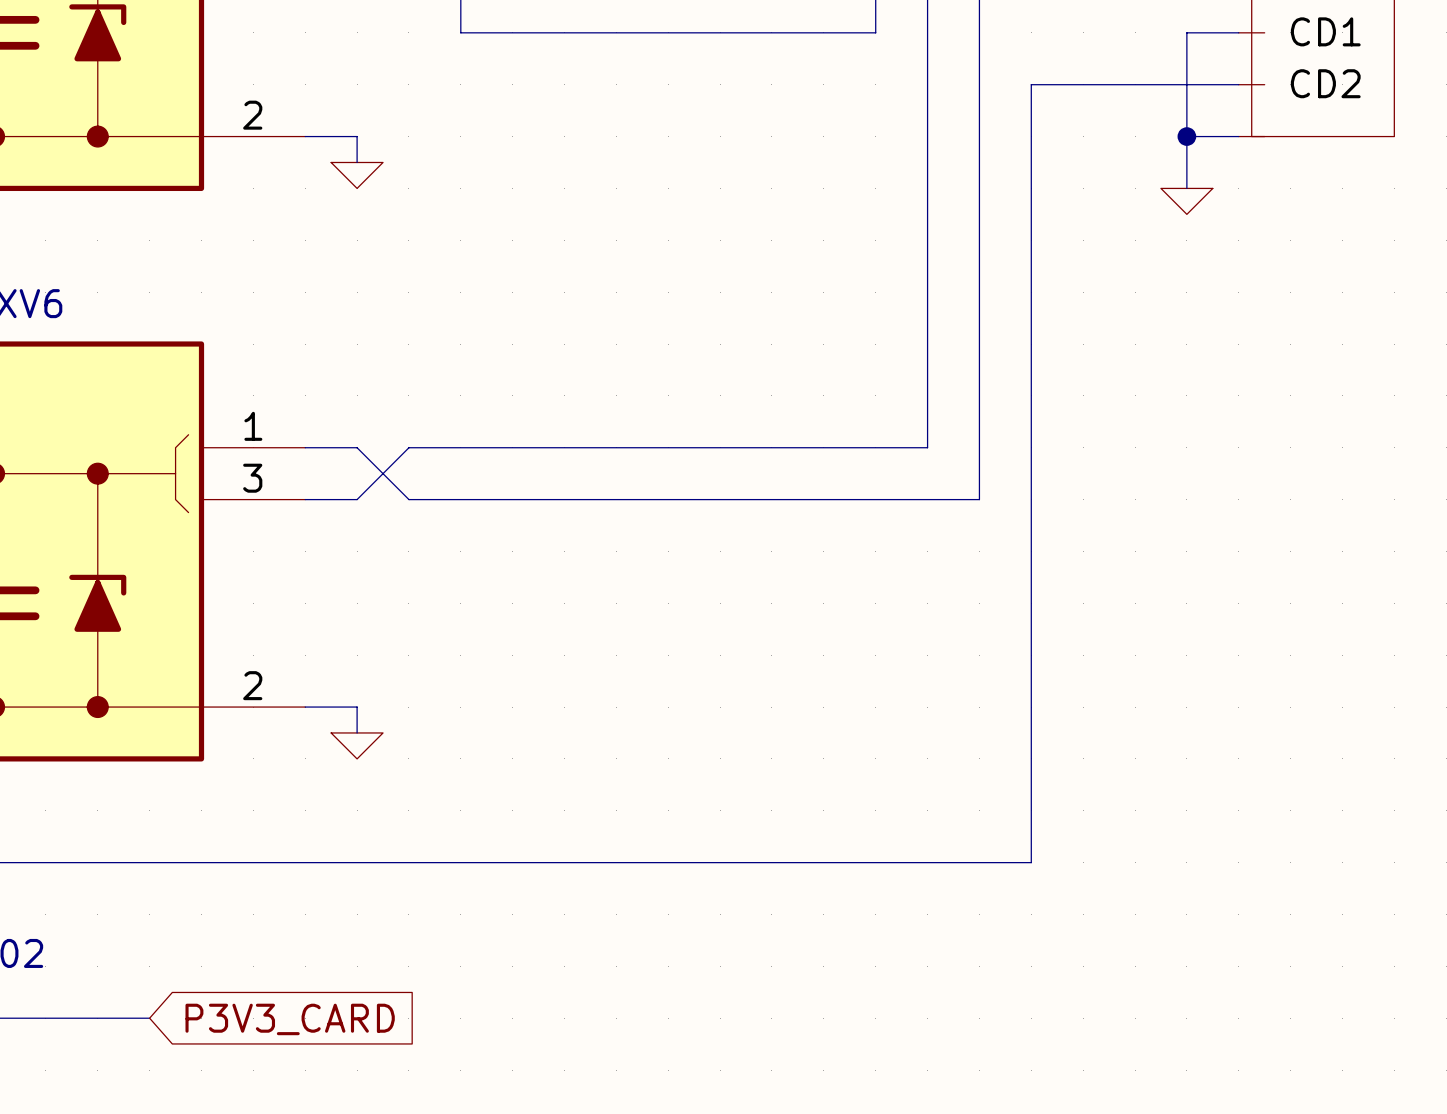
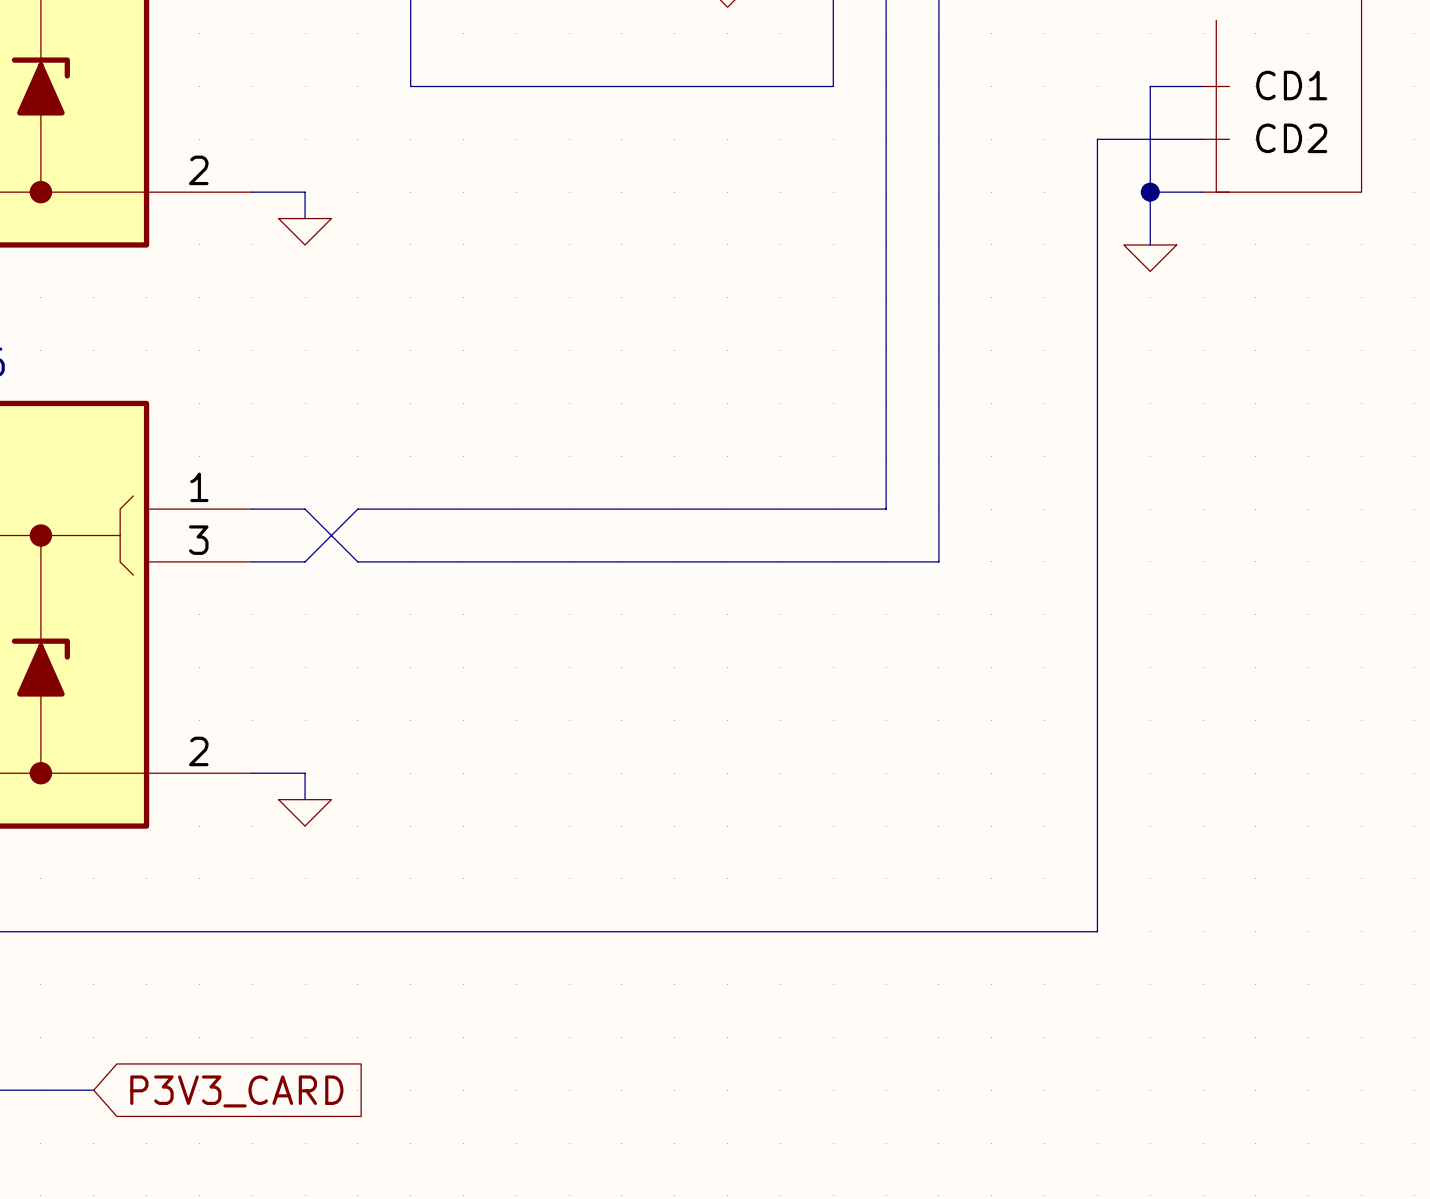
wire: (1135, 84) (1031, 84) (1031, 862) -> (1097, 139) (1097, 931) (991, 931)

